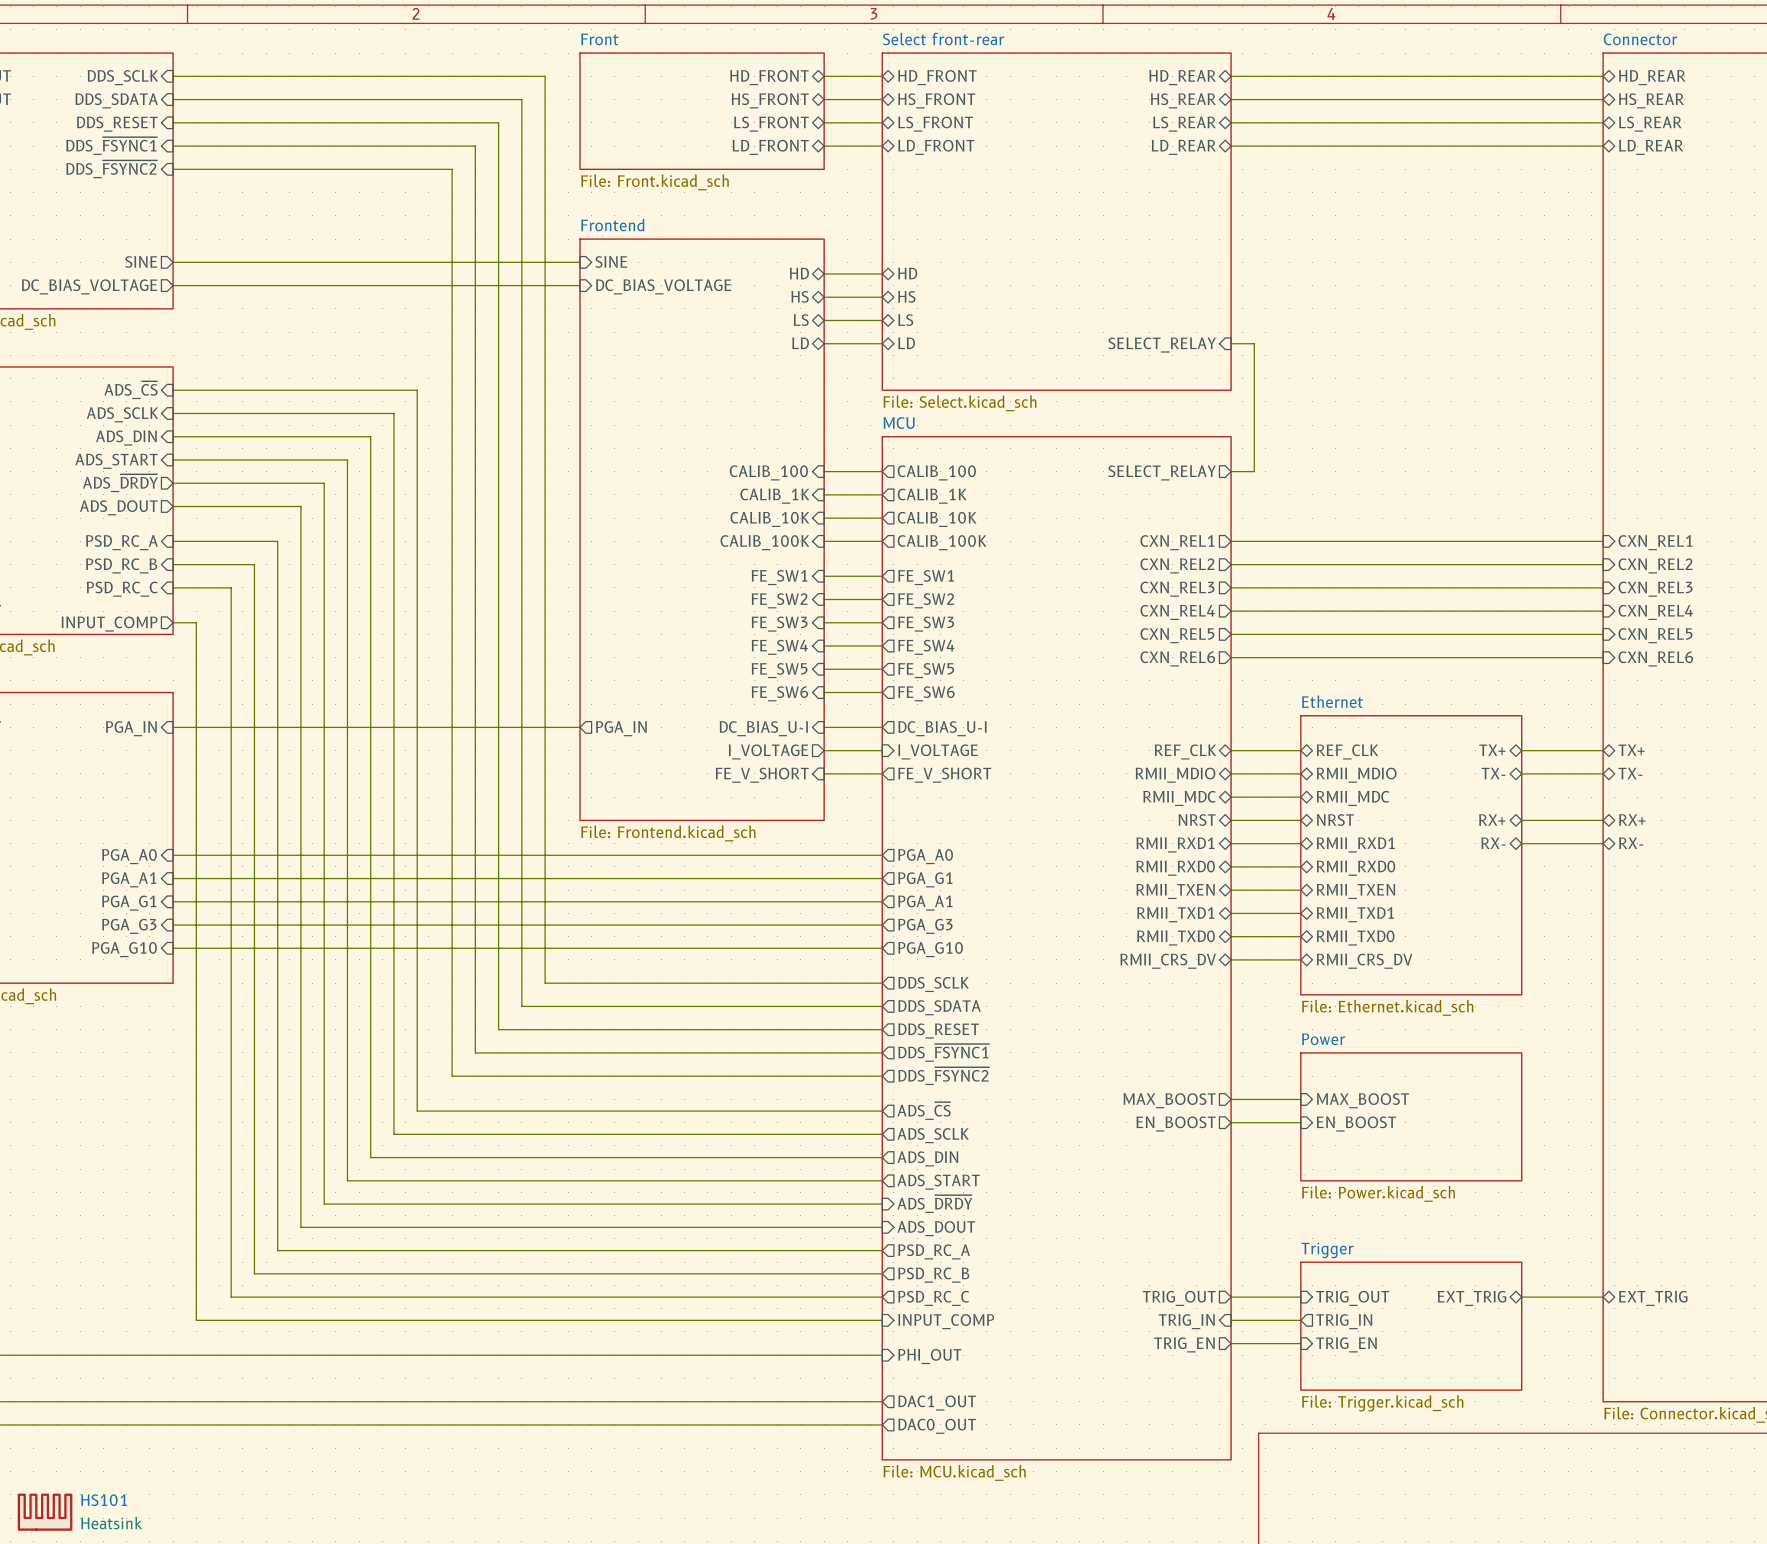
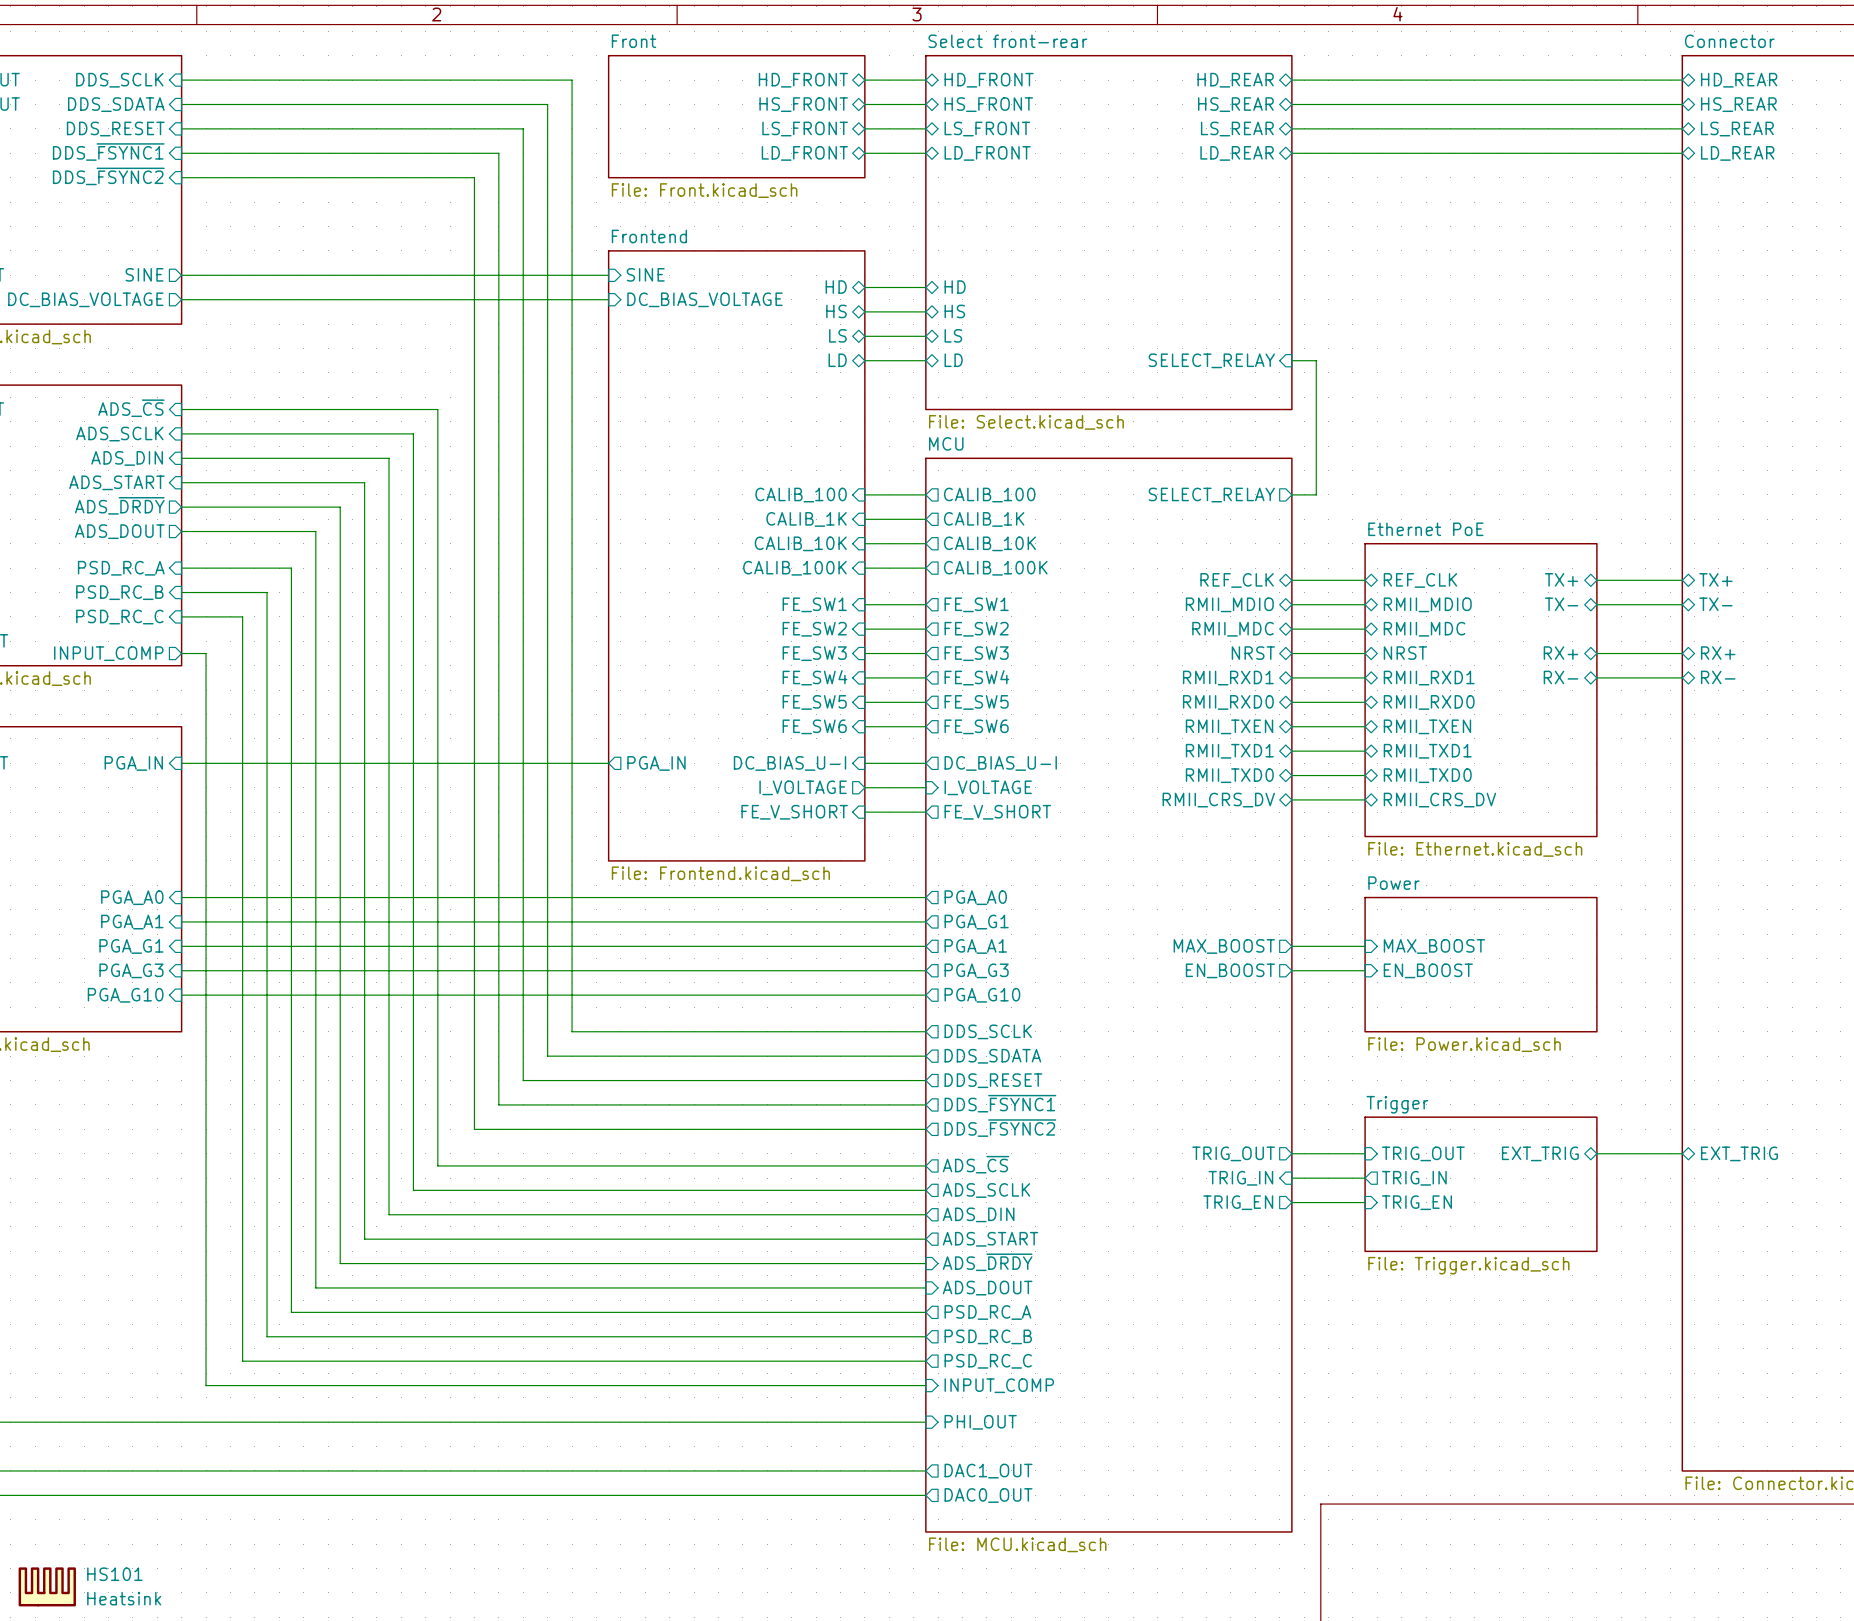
wire: (1231, 541) (1603, 541) -> none
sheet pin: CXN_REL1 (1177, 542) -> none
sheet pin: CXN_REL1 (1655, 542) -> none
sheet pin: none -> TX+ (1561, 579)
sheet pin: none -> TX+ (1715, 579)
sheet pin: none -> REF_CLK (1237, 580)
sheet pin: none -> REF_CLK (1420, 580)
wire: (1231, 564) (1603, 564) -> none
sheet pin: CXN_REL2 (1177, 565) -> none
sheet pin: CXN_REL2 (1655, 565) -> none
sheet pin: none -> TX- (1561, 604)
sheet pin: none -> TX- (1715, 604)
sheet pin: none -> RMII_MDIO (1229, 604)
sheet pin: none -> RMII_MDIO (1427, 604)
wire: (1231, 587) (1603, 587) -> none
sheet pin: CXN_REL3 (1177, 589) -> none
sheet pin: CXN_REL3 (1655, 589) -> none
sheet pin: none -> RMII_MDC (1233, 629)
sheet pin: none -> RMII_MDC (1424, 629)
wire: (1231, 611) (1603, 611) -> none
sheet pin: CXN_REL4 (1177, 612) -> none
sheet pin: CXN_REL4 (1655, 612) -> none
sheet pin: none -> NRST (1253, 653)
sheet pin: none -> NRST (1405, 653)
sheet pin: none -> RX+ (1560, 653)
sheet pin: none -> RX+ (1718, 653)
wire: (1231, 634) (1603, 634) -> none
sheet pin: CXN_REL5 (1177, 635) -> none
sheet pin: CXN_REL5 (1655, 635) -> none
sheet pin: none -> RX- (1560, 677)
sheet pin: none -> RX- (1718, 677)
sheet pin: none -> RMII_RXD1 (1228, 678)
sheet pin: none -> RMII_RXD1 (1429, 678)
wire: (1231, 657) (1603, 657) -> none
sheet Ethernet PoE: none -> File: Ethernet.kicad_sch (1480, 690)
sheet pin: CXN_REL6 (1177, 658) -> none
sheet pin: CXN_REL6 (1655, 658) -> none
sheet pin: none -> RMII_RXD0 (1228, 702)
sheet pin: none -> RMII_RXD0 (1429, 702)
sheet pin: none -> RMII_TXEN (1229, 726)
sheet pin: none -> RMII_TXEN (1427, 726)
sheet pin: none -> RMII_TXD1 (1229, 751)
sheet pin: none -> RMII_TXD1 (1427, 751)
sheet pin: none -> RMII_TXD0 (1229, 775)
sheet pin: none -> RMII_TXD0 (1427, 775)
wire: (1231, 750) (1300, 750) -> (1291, 580) (1365, 580)
sheet pin: TX+ (1492, 750) -> none
wire: (1521, 750) (1603, 750) -> (1596, 580) (1682, 580)
sheet pin: TX+ (1631, 750) -> none
sheet pin: REF_CLK (1185, 751) -> none
sheet pin: REF_CLK (1347, 751) -> none
sheet pin: none -> RMII_CRS_DV (1218, 800)
sheet pin: none -> RMII_CRS_DV (1439, 800)
wire: (1231, 773) (1300, 773) -> (1291, 604) (1365, 604)
sheet pin: TX- (1493, 773) -> none
wire: (1521, 773) (1603, 773) -> (1596, 604) (1682, 604)
sheet pin: TX- (1630, 773) -> none
sheet pin: RMII_MDIO (1175, 775) -> none
sheet pin: RMII_MDIO (1356, 775) -> none
wire: (1231, 797) (1300, 797) -> (1291, 629) (1365, 629)
sheet pin: RMII_MDC (1179, 798) -> none
sheet pin: RMII_MDC (1352, 798) -> none
sheet pin: RX+ (1492, 819) -> none
sheet pin: RX+ (1632, 819) -> none
sheet pin: NRST (1197, 820) -> none
wire: (1231, 820) (1300, 820) -> (1291, 653) (1365, 653)
sheet pin: NRST (1335, 820) -> none
wire: (1521, 820) (1603, 820) -> (1596, 653) (1682, 653)
wire: (1231, 843) (1300, 843) -> (1291, 677) (1365, 677)
sheet pin: RX- (1493, 843) -> none
wire: (1521, 843) (1603, 843) -> (1596, 677) (1682, 677)
sheet pin: RX- (1631, 843) -> none
sheet pin: RMII_RXD1 (1175, 844) -> none
sheet pin: RMII_RXD1 (1355, 844) -> none
sheet Ethernet: File: Ethernet.kicad_sch (1411, 855) -> none
wire: (1231, 866) (1300, 866) -> (1291, 702) (1365, 702)
sheet pin: RMII_RXD0 (1175, 868) -> none
sheet pin: RMII_RXD0 (1356, 868) -> none
wire: (1231, 890) (1300, 890) -> (1291, 726) (1365, 726)
sheet pin: RMII_TXEN (1175, 891) -> none
sheet pin: RMII_TXEN (1355, 891) -> none
wire: none -> (1291, 946) (1365, 946)
sheet pin: none -> MAX_BOOST (1224, 946)
sheet pin: none -> MAX_BOOST (1434, 946)
wire: (1231, 913) (1300, 913) -> (1291, 751) (1365, 751)
sheet pin: RMII_TXD1 (1175, 914) -> none
sheet pin: RMII_TXD1 (1355, 914) -> none
wire: none -> (1291, 970) (1365, 970)
sheet pin: none -> EN_BOOST (1230, 970)
sheet pin: none -> EN_BOOST (1428, 970)
wire: (1231, 936) (1300, 936) -> (1291, 775) (1365, 775)
sheet pin: RMII_TXD0 (1176, 937) -> none
sheet pin: RMII_TXD0 (1355, 937) -> none
wire: (1231, 959) (1300, 959) -> (1291, 799) (1365, 799)
sheet pin: RMII_CRS_DV (1168, 961) -> none
sheet pin: RMII_CRS_DV (1364, 961) -> none
sheet pin: MAX_BOOST (1169, 1100) -> TRIG_OUT (1233, 1153)
sheet pin: MAX_BOOST (1362, 1100) -> TRIG_OUT (1423, 1153)
sheet pin: none -> EXT_TRIG (1540, 1153)
sheet pin: none -> EXT_TRIG (1739, 1153)
sheet Power position: (1411, 1116) -> (1480, 964)
sheet pin shape: output (1176, 1124) -> input (1240, 1178)
sheet pin: EN_BOOST (1176, 1124) -> TRIG_IN (1240, 1178)
sheet pin shape: input (1356, 1124) -> output (1414, 1178)
sheet pin: EN_BOOST (1356, 1124) -> TRIG_IN (1414, 1178)
sheet pin: none -> TRIG_EN (1238, 1202)
sheet pin: none -> TRIG_EN (1416, 1202)
wire: (1231, 1297) (1300, 1297) -> none
wire: (1521, 1297) (1603, 1297) -> (1596, 1153) (1682, 1153)
sheet pin: TRIG_OUT (1179, 1298) -> none
sheet pin: TRIG_OUT (1352, 1298) -> none
sheet pin: EXT_TRIG (1472, 1298) -> none
sheet pin: EXT_TRIG (1653, 1298) -> none
wire: (1231, 1320) (1300, 1320) -> none
sheet pin: TRIG_IN (1186, 1321) -> none
sheet pin: TRIG_IN (1344, 1321) -> none
sheet Trigger position: (1411, 1326) -> (1480, 1184)
wire: (1231, 1343) (1300, 1343) -> (1291, 1202) (1365, 1202)
sheet pin: TRIG_EN (1184, 1344) -> none
sheet pin: TRIG_EN (1346, 1344) -> none

